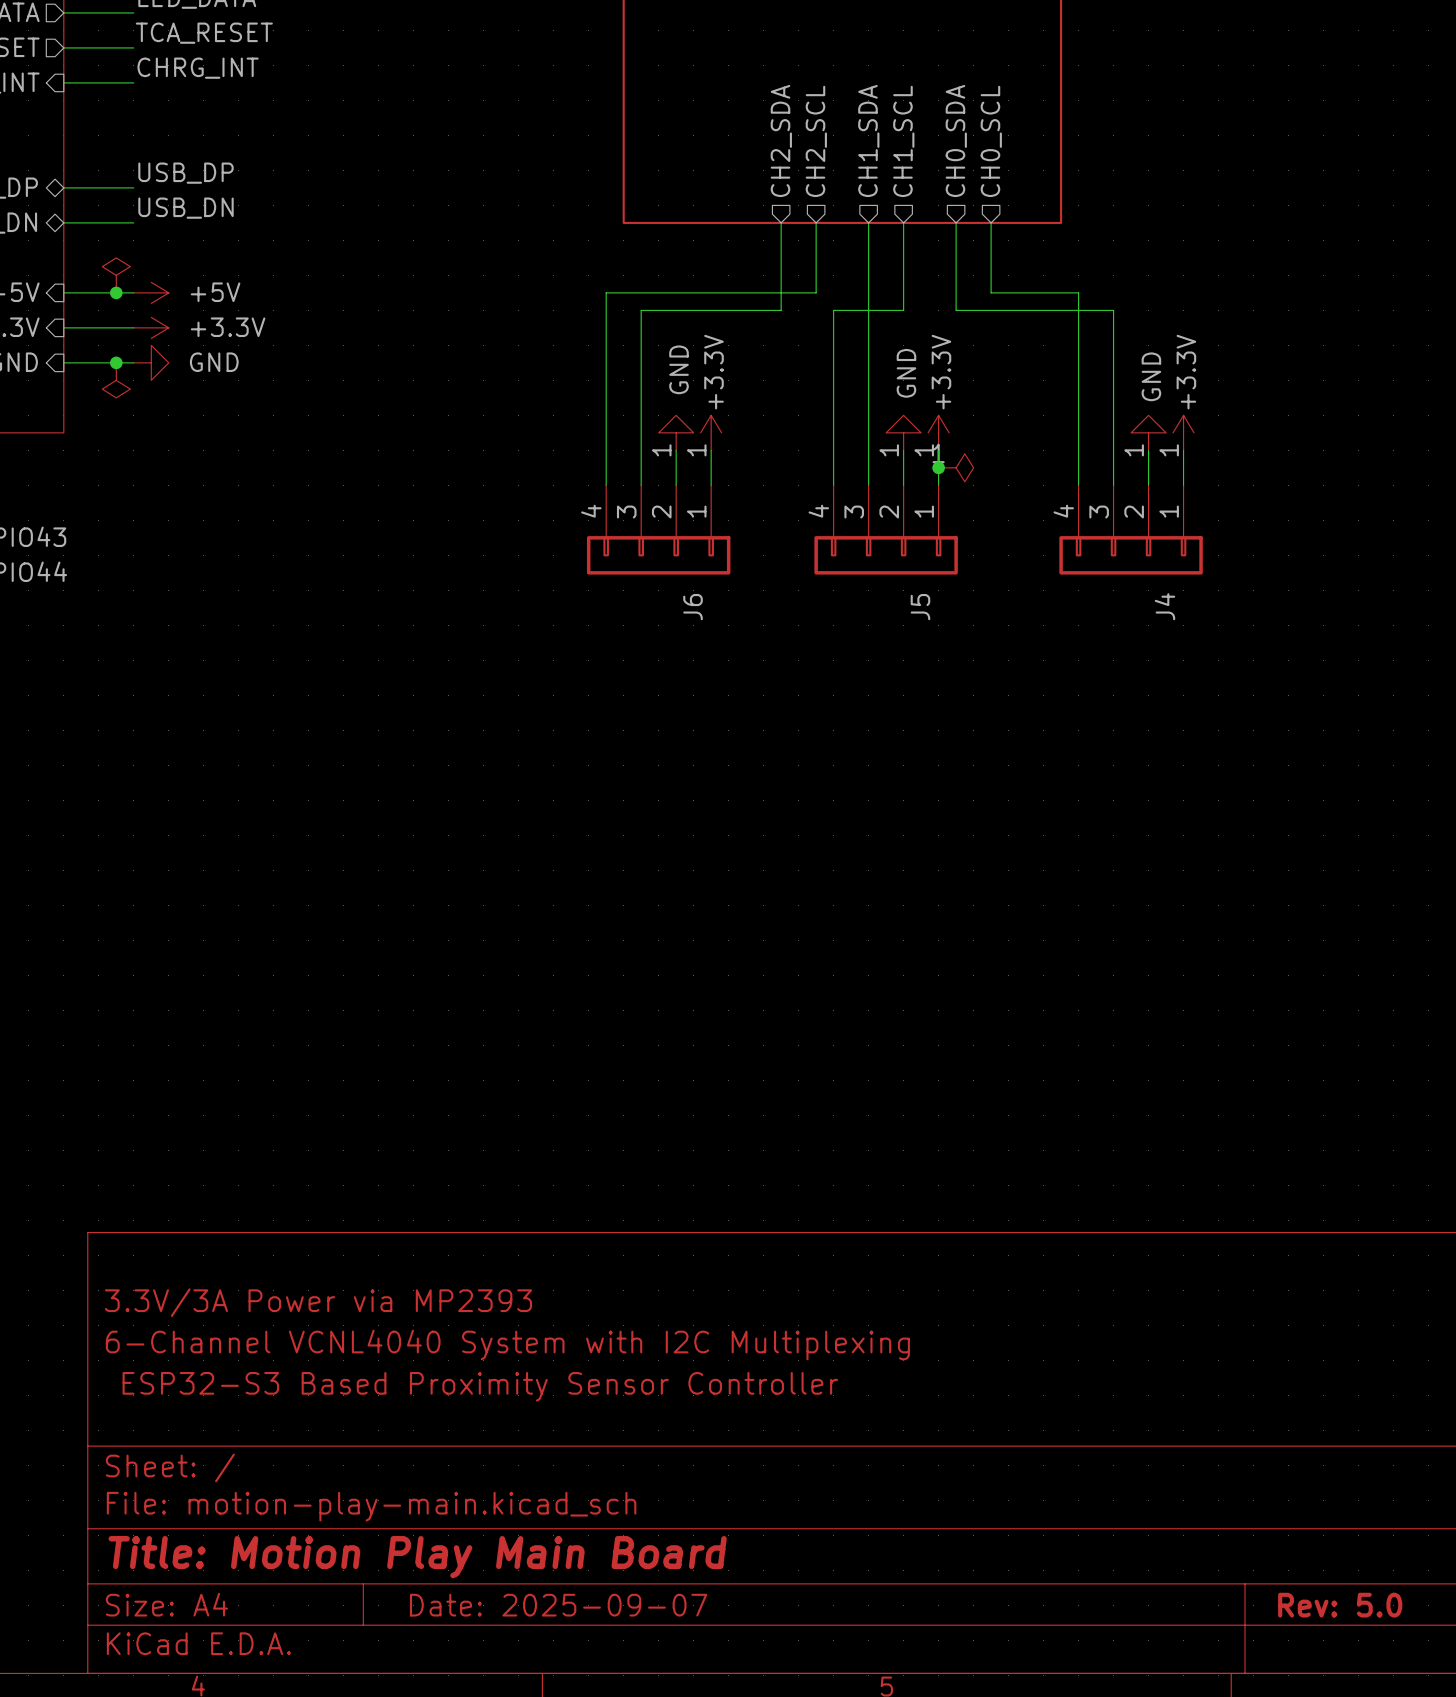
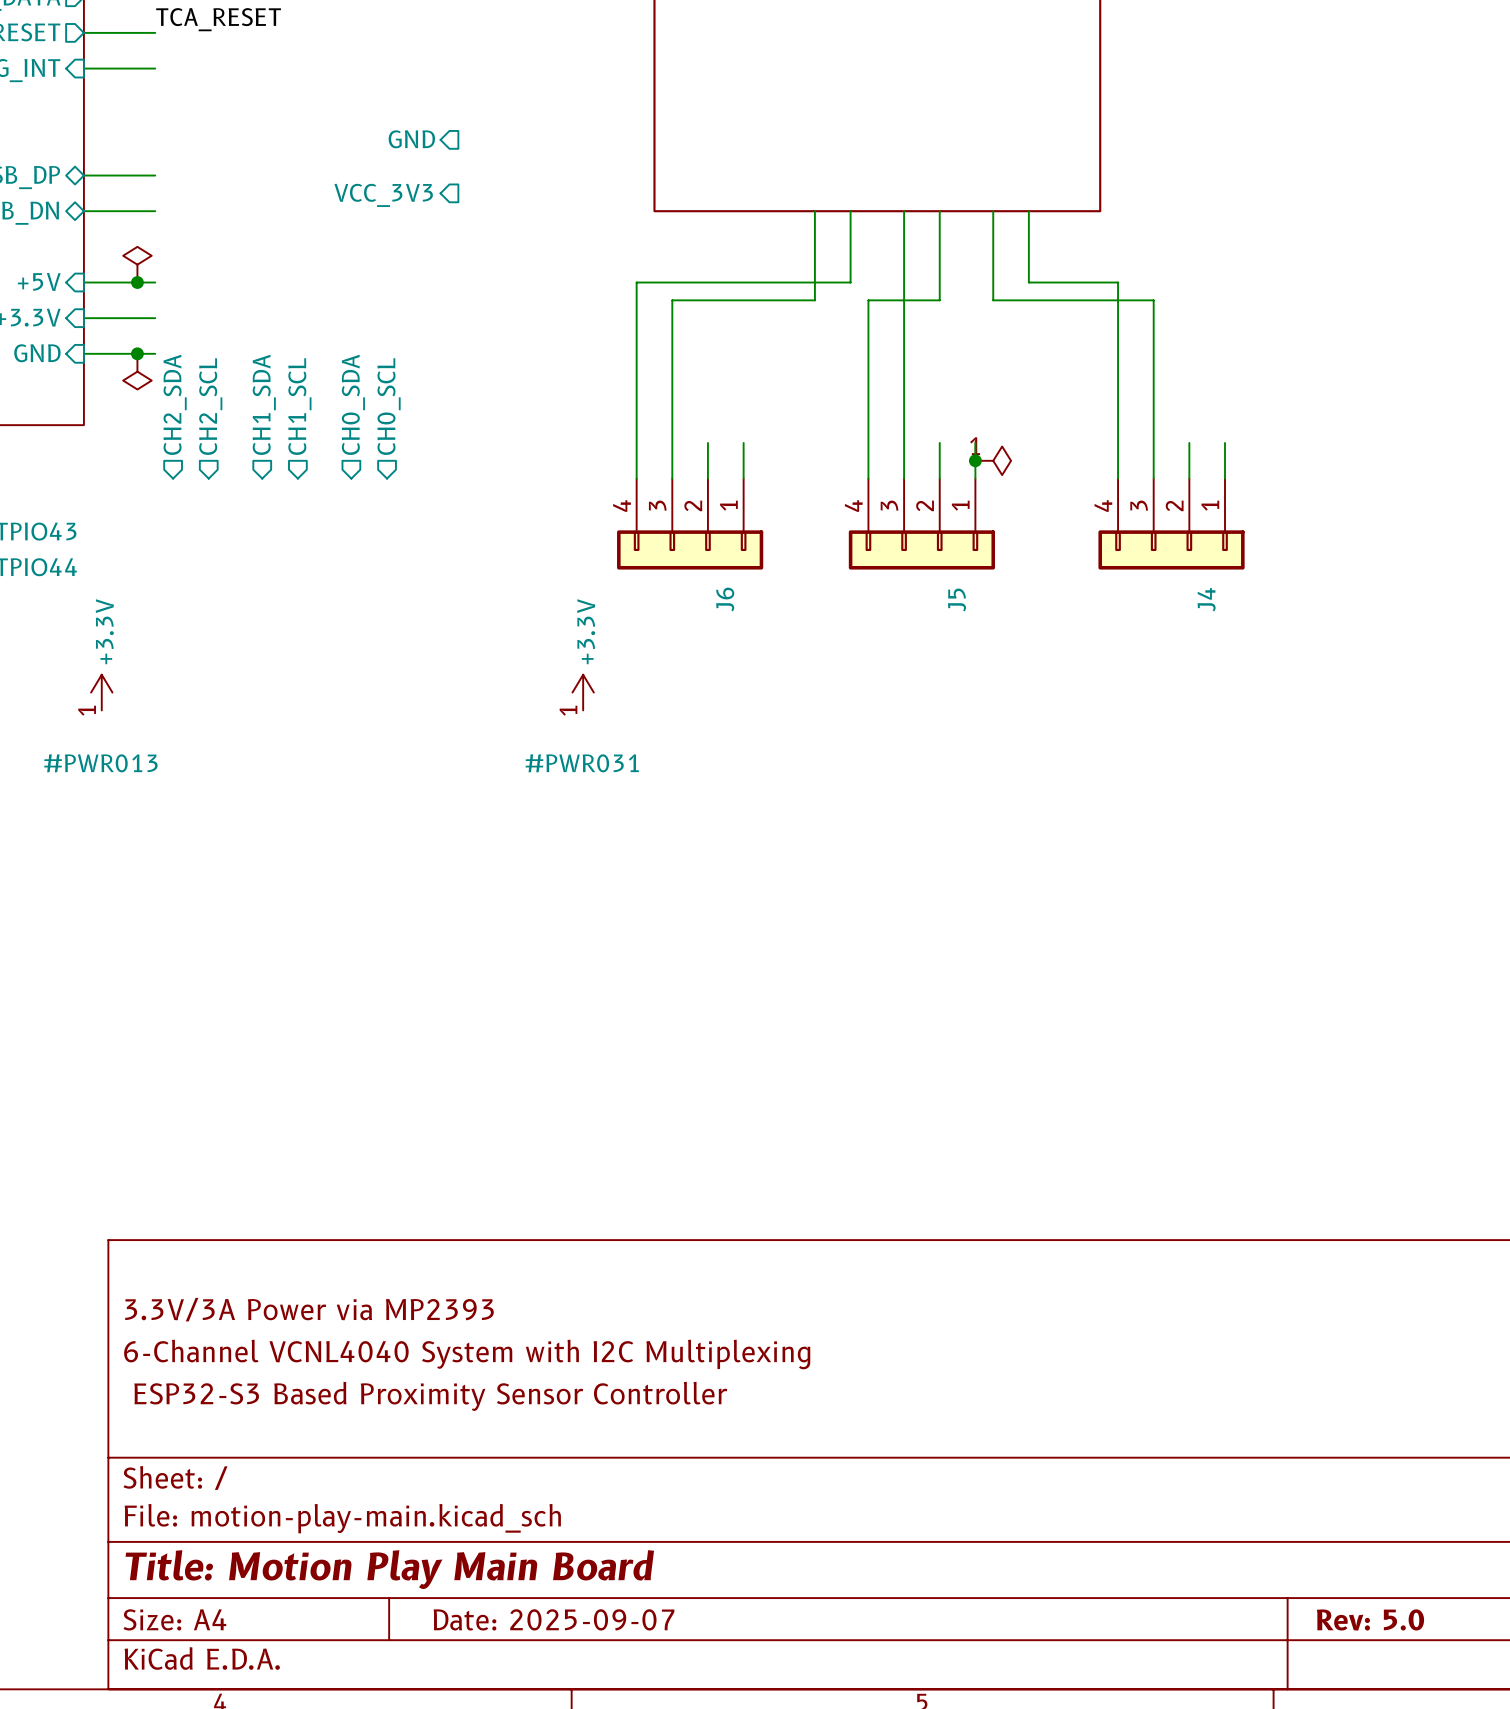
label: CHRG_INT (198, 68) -> none
sheet pin: CH2_SDA (781, 140) -> none
sheet pin: CH1_SDA (868, 140) -> none
sheet pin: CH0_SDA (956, 140) -> none
sheet pin: CH2_SCL (816, 141) -> none
sheet pin: CH1_SCL (903, 141) -> none
sheet pin: CH0_SCL (991, 141) -> none
sheet pin: none -> GND (411, 139)
label: USB_DP (186, 173) -> none
sheet pin: none -> VCC_3V3 (383, 195)
label: USB_DN (186, 208) -> none
power symbol: +5V (151, 292) -> none
power symbol: +3.3V (151, 327) -> none
power symbol: GND (151, 362) -> none
sheet pin: none -> CH2_SDA (175, 404)
sheet pin: none -> CH2_SCL (210, 406)
sheet pin: none -> CH1_SDA (264, 404)
sheet pin: none -> CH1_SCL (299, 406)
sheet pin: none -> CH0_SDA (353, 404)
sheet pin: none -> CH0_SCL (389, 406)
power symbol: GND (676, 432) -> none
power symbol: +3.3V (711, 432) -> none
power symbol: GND (903, 432) -> none
power symbol: +3.3V (938, 432) -> none
power symbol: GND (1148, 432) -> none
power symbol: +3.3V (1183, 432) -> none
#PWR013: none -> +3.3V (101, 692)
#PWR031: none -> +3.3V (583, 692)

